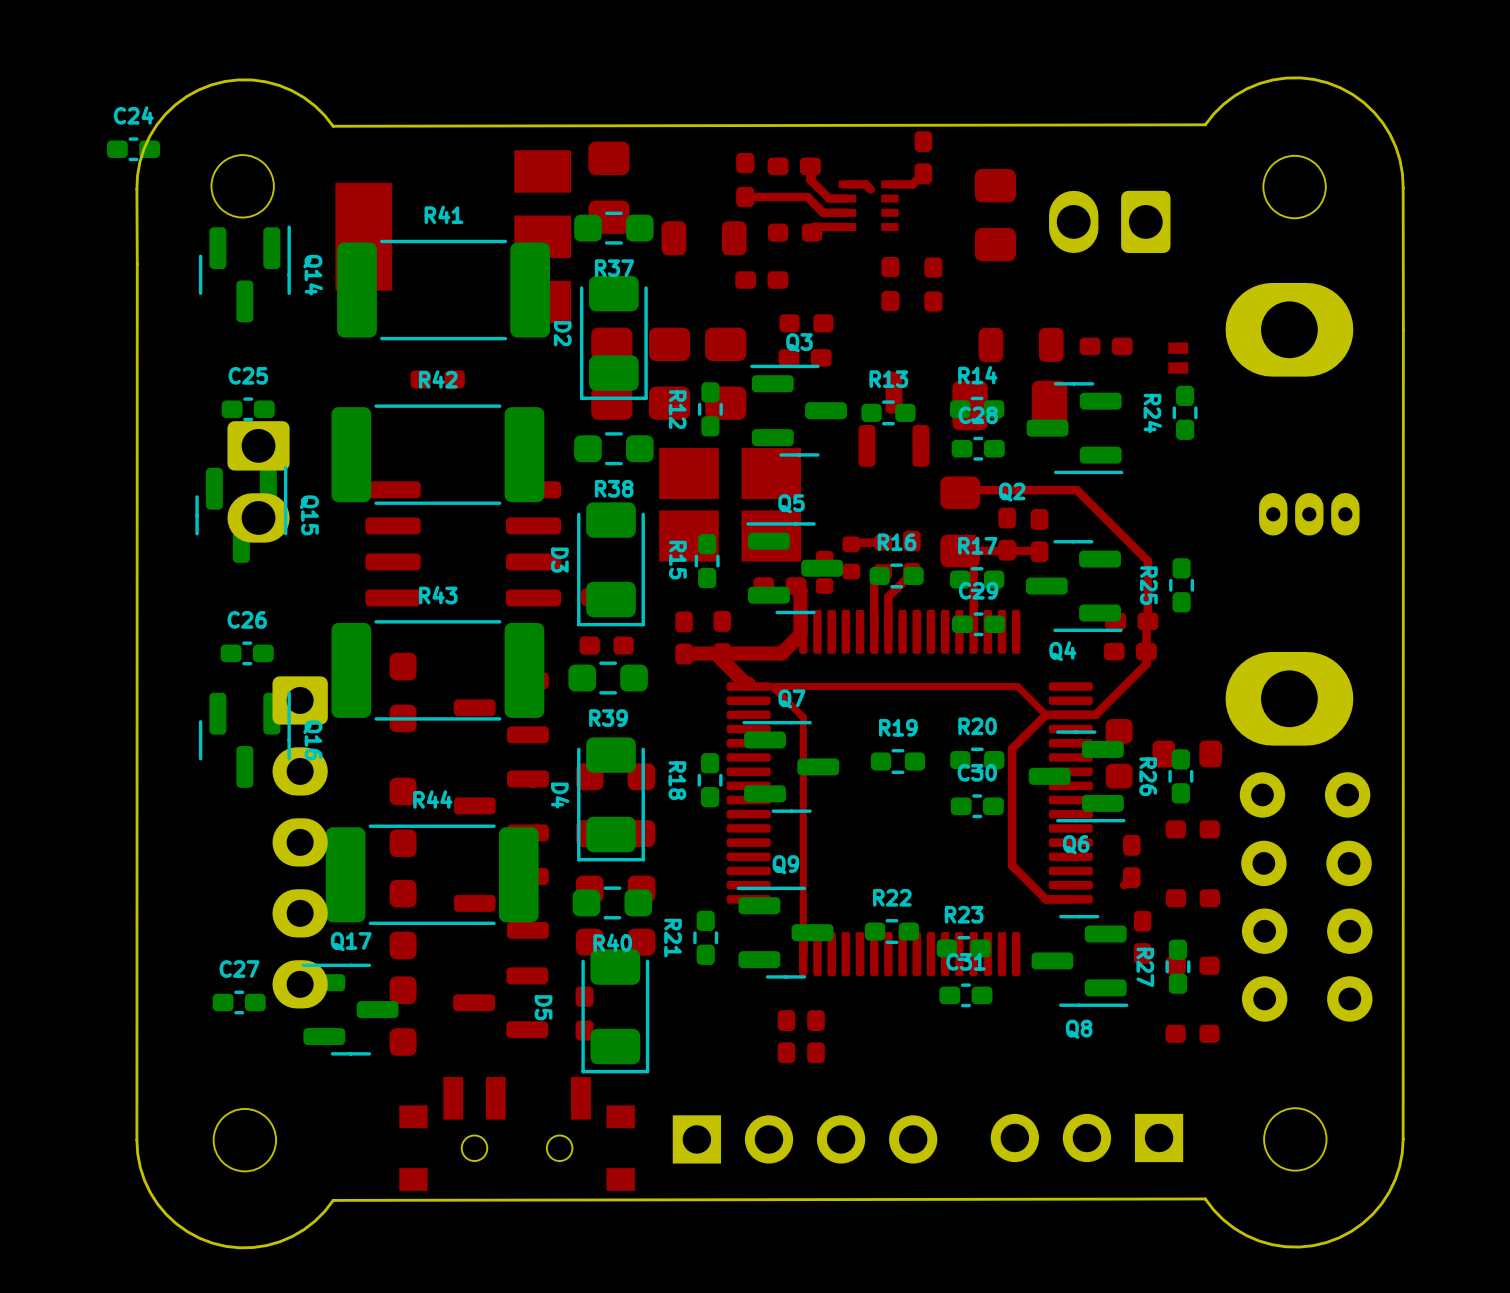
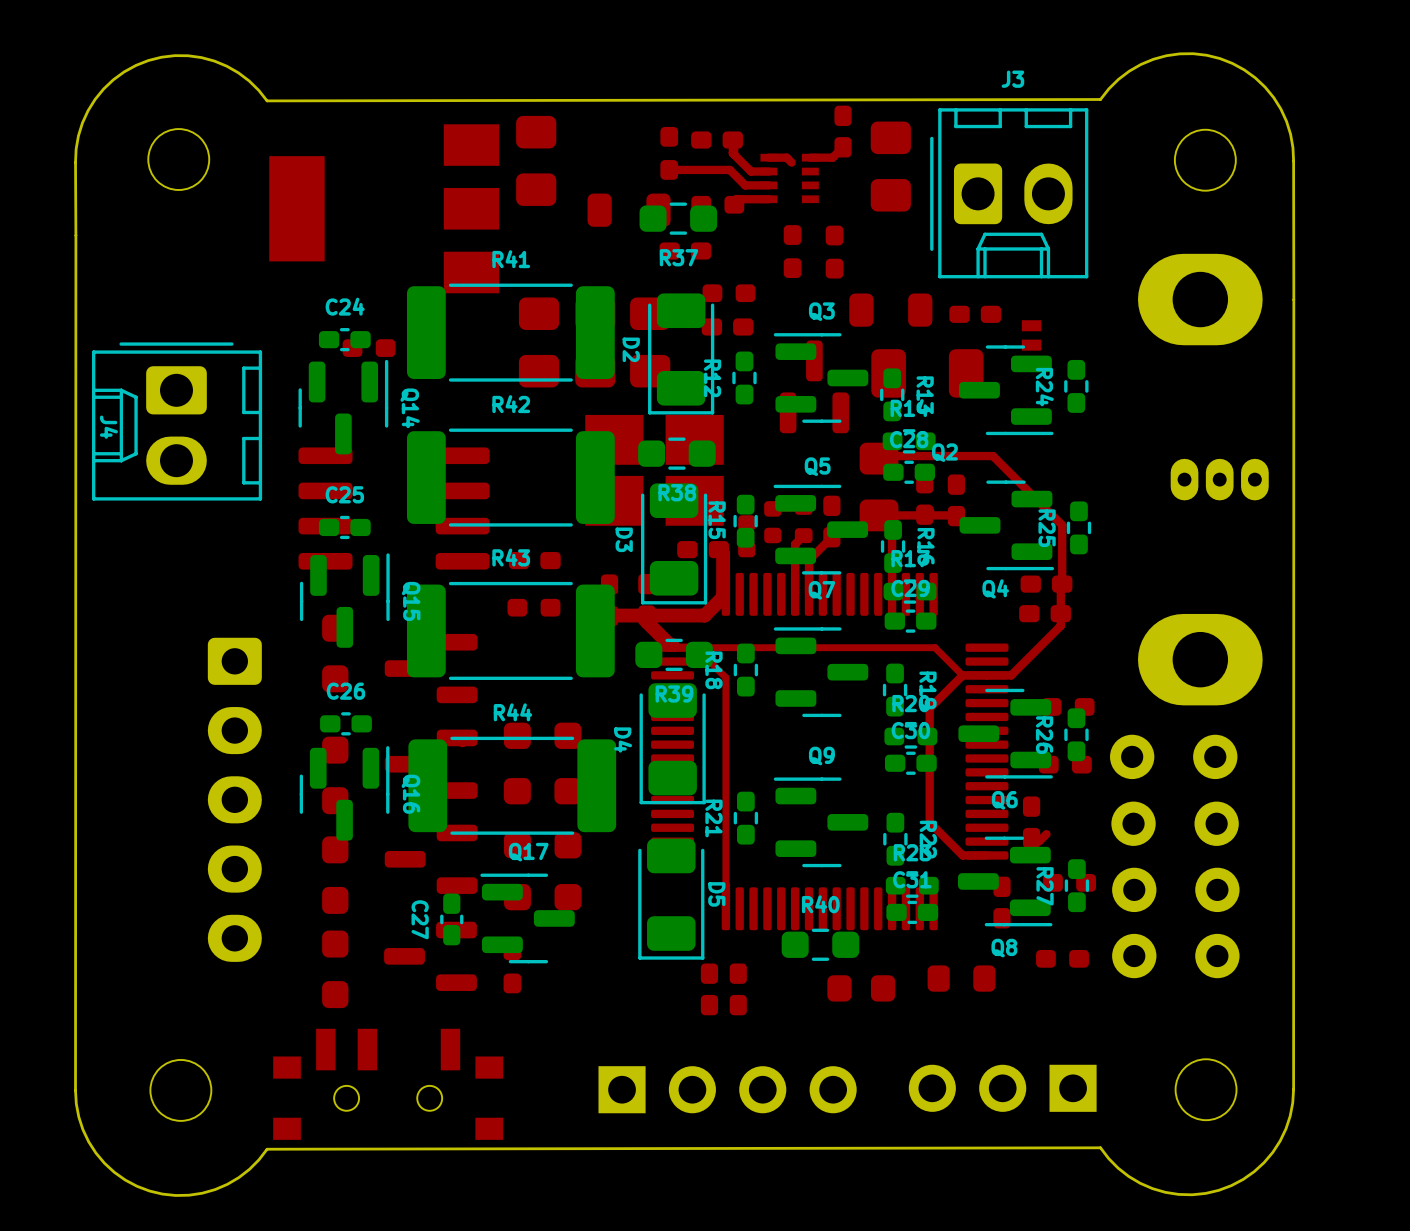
board edge: (1187, 124) (1205, 124) (1223, 104) (1246, 88) (1259, 83) (1286, 78) (1314, 79) (1340, 87) (1363, 102) (1382, 122) (1390, 134) (1400, 160) (1403, 187) (1403, 1139) (1399, 1166) (1395, 1179) (1381, 1203) (1362, 1223) (1339, 1237) (1313, 1245) (1299, 1247) (1271, 1244) (1246, 1235) (1223, 1219) (1205, 1198) (333, 1200) -> (1100, 99) (1118, 79) (1140, 64) (1153, 59) (1179, 53) (1206, 55) (1232, 63) (1255, 77) (1265, 87) (1280, 109) (1286, 121) (1292, 147) (1293, 1089) (1290, 1116) (1280, 1141) (1272, 1152) (1264, 1162) (1243, 1179) (1218, 1190) (1192, 1194) (1165, 1192) (1140, 1183) (1118, 1168) (1100, 1147) (267, 1149)
C24 position: (133, 149) -> (344, 339)
part position: (995, 215) -> (890, 166)
J3 side: top (1109, 221) -> bottom (1009, 193)
R37 position: (613, 228) -> (678, 218)
Q14 position: (244, 273) -> (343, 407)
part: none -> (792, 251)
part: none -> (834, 252)
part: (890, 284) -> none
part: (933, 284) -> none
R41 position: (443, 290) -> (510, 332)
D2 position: (613, 337) -> (681, 353)
part footprint: [1079, 337, 1133, 356] -> [1021, 320, 1042, 351]
part position: (1021, 344) -> (890, 310)
part: none -> (975, 314)
part: (1178, 358) -> none
C25 position: (248, 409) -> (344, 527)
R12 position: (710, 409) -> (744, 377)
R14 position: (977, 409) -> (909, 441)
Q3 position: (798, 410) -> (821, 377)
R13 rotation: 0° (888, 412) -> 90° clockwise (892, 394)
R13 position: (888, 412) -> (892, 394)
R24 position: (1185, 412) -> (1076, 386)
Q2 position: (1075, 428) -> (1006, 390)
R38 position: (613, 448) -> (676, 453)
C28 position: (978, 448) -> (909, 472)
R42 position: (437, 454) -> (510, 477)
J4 side: top (258, 481) -> bottom (177, 421)
Q15 position: (241, 514) -> (344, 600)
R15 position: (707, 561) -> (745, 521)
D3 position: (610, 564) -> (674, 543)
Q5 position: (794, 568) -> (820, 529)
R16 rotation: 0° (896, 575) -> 90° clockwise (893, 546)
R16 position: (896, 575) -> (893, 546)
R17 position: (977, 579) -> (909, 591)
R25 position: (1181, 585) -> (1078, 527)
Q4 position: (1074, 586) -> (1006, 525)
C29 position: (978, 624) -> (910, 621)
C26 position: (247, 653) -> (345, 723)
R43 position: (437, 670) -> (510, 630)
R39 position: (608, 678) -> (674, 654)
Q7 name position: Q7 (791, 698) -> Q7 (821, 590)
Q16 position: (244, 739) -> (344, 793)
part: none -> (1068, 706)
part rotation: 0° (1119, 753) -> 90° clockwise (861, 988)
part position: (1119, 753) -> (861, 988)
part position: (1187, 754) -> (961, 978)
R20 position: (977, 760) -> (910, 736)
R19 rotation: 0° (897, 761) -> 90° clockwise (895, 690)
R19 position: (897, 761) -> (895, 690)
Q7 position: (790, 766) -> (821, 672)
Q6 position: (1077, 776) -> (1005, 733)
R26 position: (1180, 776) -> (1076, 734)
R18 position: (710, 780) -> (745, 670)
part: (1305, 794) -> none
part: none -> (1173, 756)
D4 position: (610, 799) -> (672, 743)
C30 position: (977, 806) -> (910, 763)
part: none -> (1065, 764)
part: (1192, 829) -> none
part position: (1131, 861) -> (1031, 822)
part: (1306, 863) -> none
part: none -> (1175, 823)
R44 position: (432, 874) -> (512, 785)
part: (1192, 898) -> none
R40 position: (612, 902) -> (820, 944)
part footprint: [1133, 910, 1152, 964] -> [1043, 873, 1097, 892]
R22 rotation: 0° (891, 931) -> 90° clockwise (895, 839)
R22 position: (891, 931) -> (895, 839)
part: (1307, 931) -> none
Q9 position: (785, 932) -> (821, 822)
part: none -> (1175, 889)
R21 position: (705, 937) -> (745, 818)
R40 name position: R40 (612, 942) -> R40 (820, 904)
part: none -> (1002, 902)
R23 position: (963, 948) -> (912, 885)
Q8 position: (1079, 960) -> (1005, 881)
part: (1192, 965) -> none
R27 position: (1177, 966) -> (1076, 885)
C31 position: (965, 995) -> (912, 912)
part: (1307, 998) -> none
C27 rotation: 0° (239, 1002) -> 90° clockwise (451, 919)
C27 position: (239, 1002) -> (451, 919)
part: none -> (1175, 956)
part: none -> (1062, 958)
D5 name position: D5 (543, 1007) -> D5 (716, 894)
Q17 position: (350, 1009) -> (527, 918)
D5 position: (615, 1011) -> (671, 899)
part: (1192, 1033) -> none
part position: (517, 1133) -> (388, 1084)

